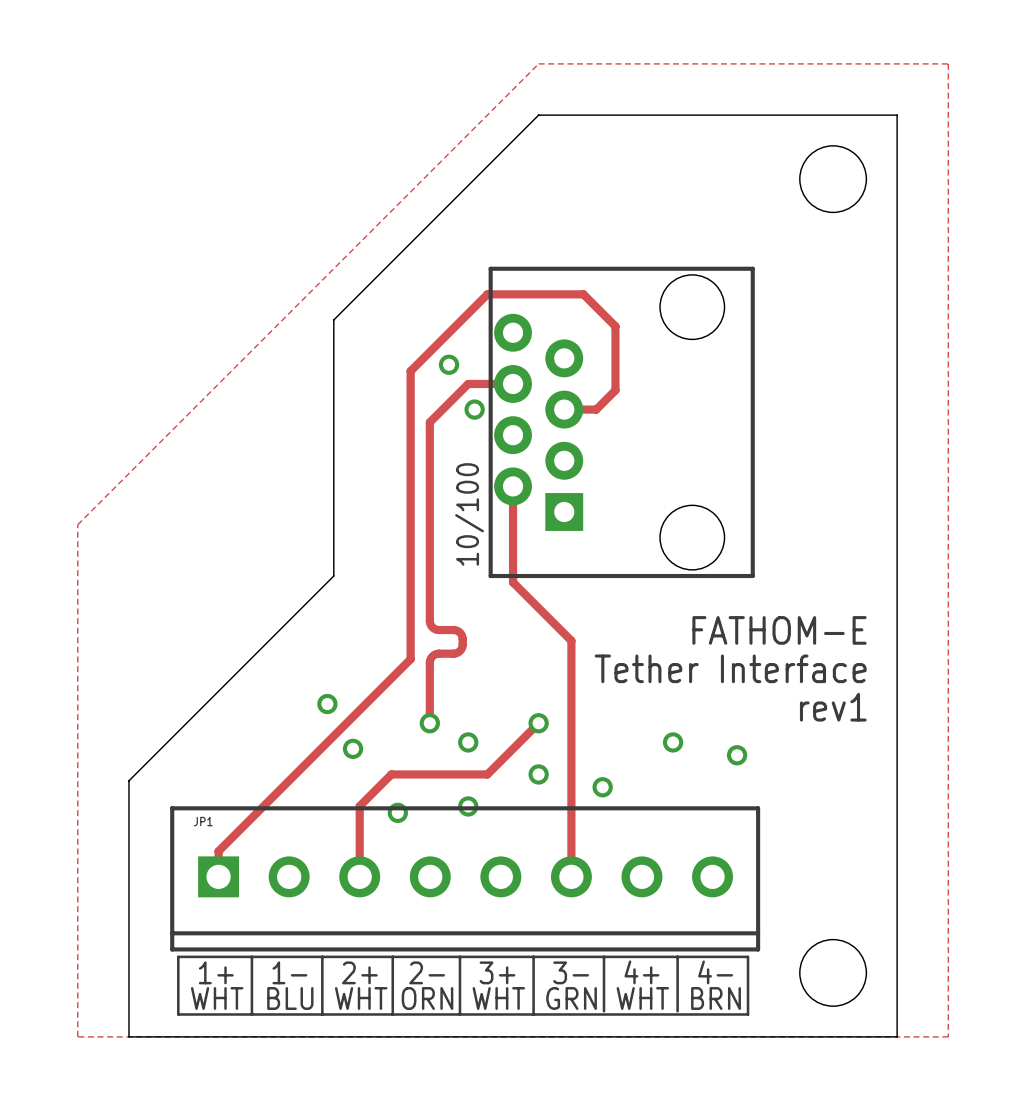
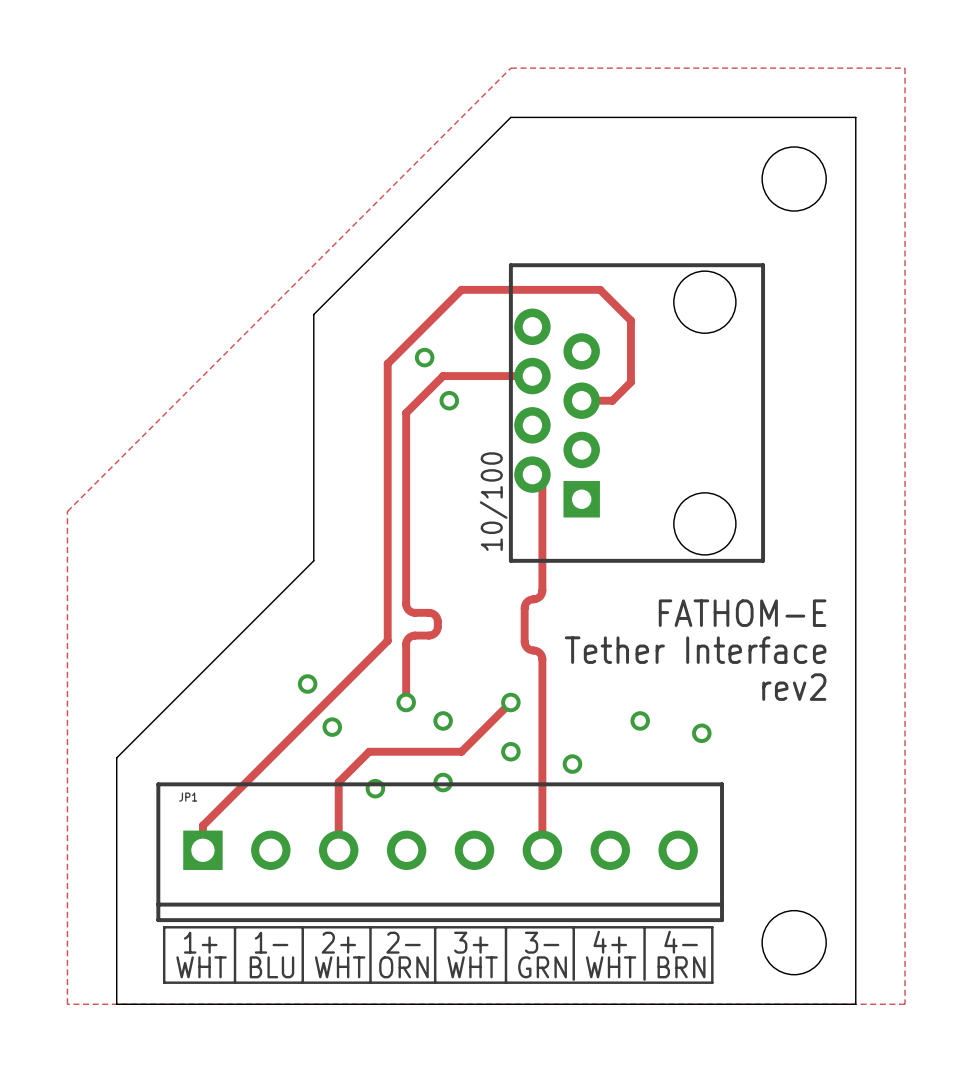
track: (583, 294) (615, 326) (615, 390) (596, 409) (564, 409) -> (553, 289) (600, 289) (630, 320) (630, 382) (612, 400) (581, 400)
track: none -> (486, 376) (532, 376)
part position: (621, 422) -> (636, 413)
track: (513, 486) (513, 582) (571, 640) (571, 678) -> (532, 474) (542, 484) (542, 590) (538, 597) (529, 600) (525, 604) (524, 641) (528, 648) (539, 653) (542, 659)
text position: 10/100 (469, 514) -> 10/100 (493, 501)
text: rev1 (833, 707) -> rev2 (794, 687)

